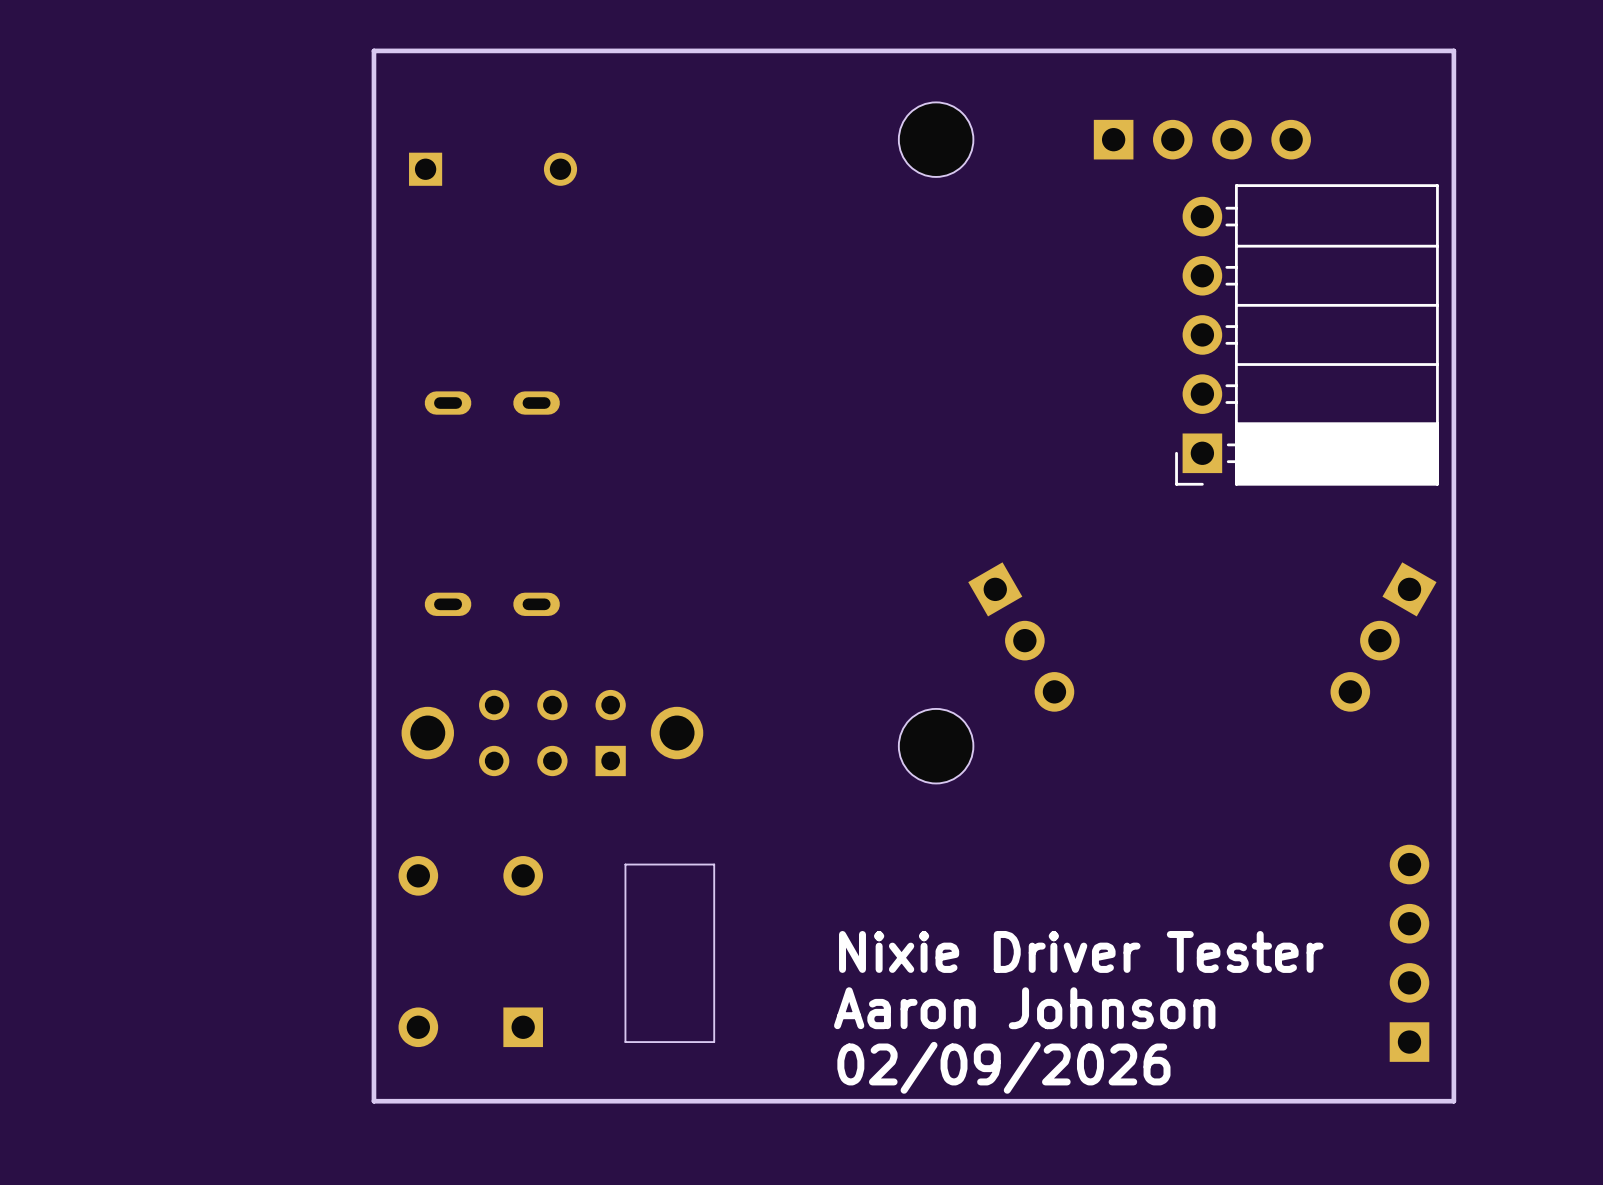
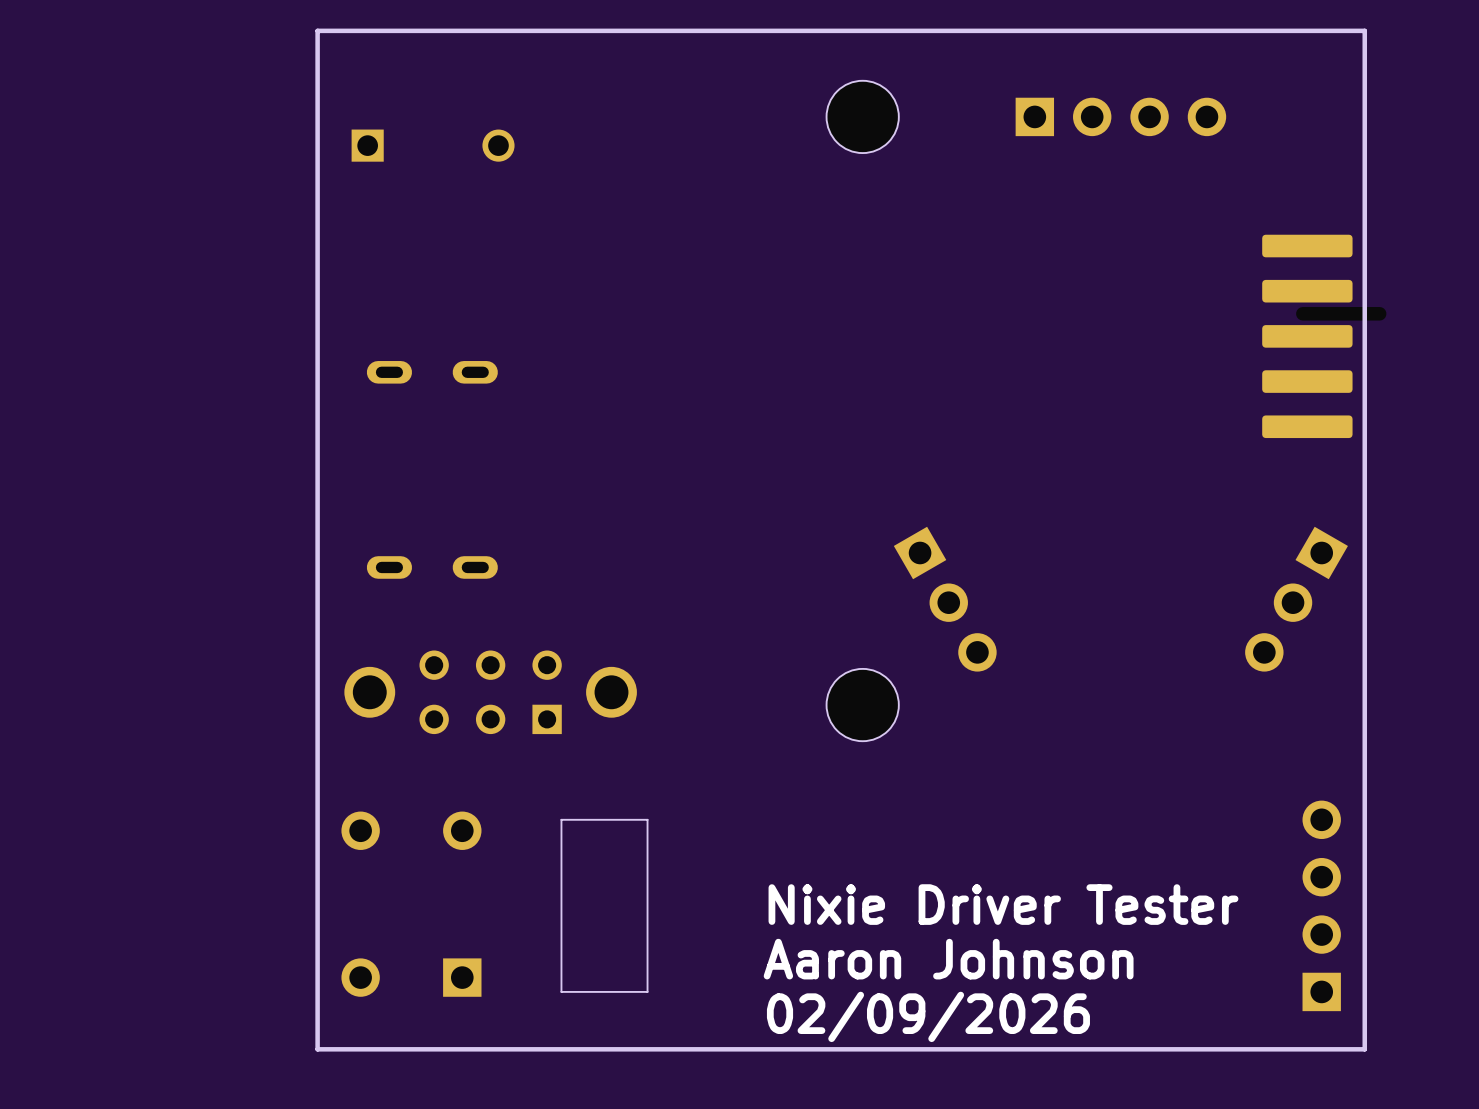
part: (1306, 334) -> none
part: none -> (1324, 336)

